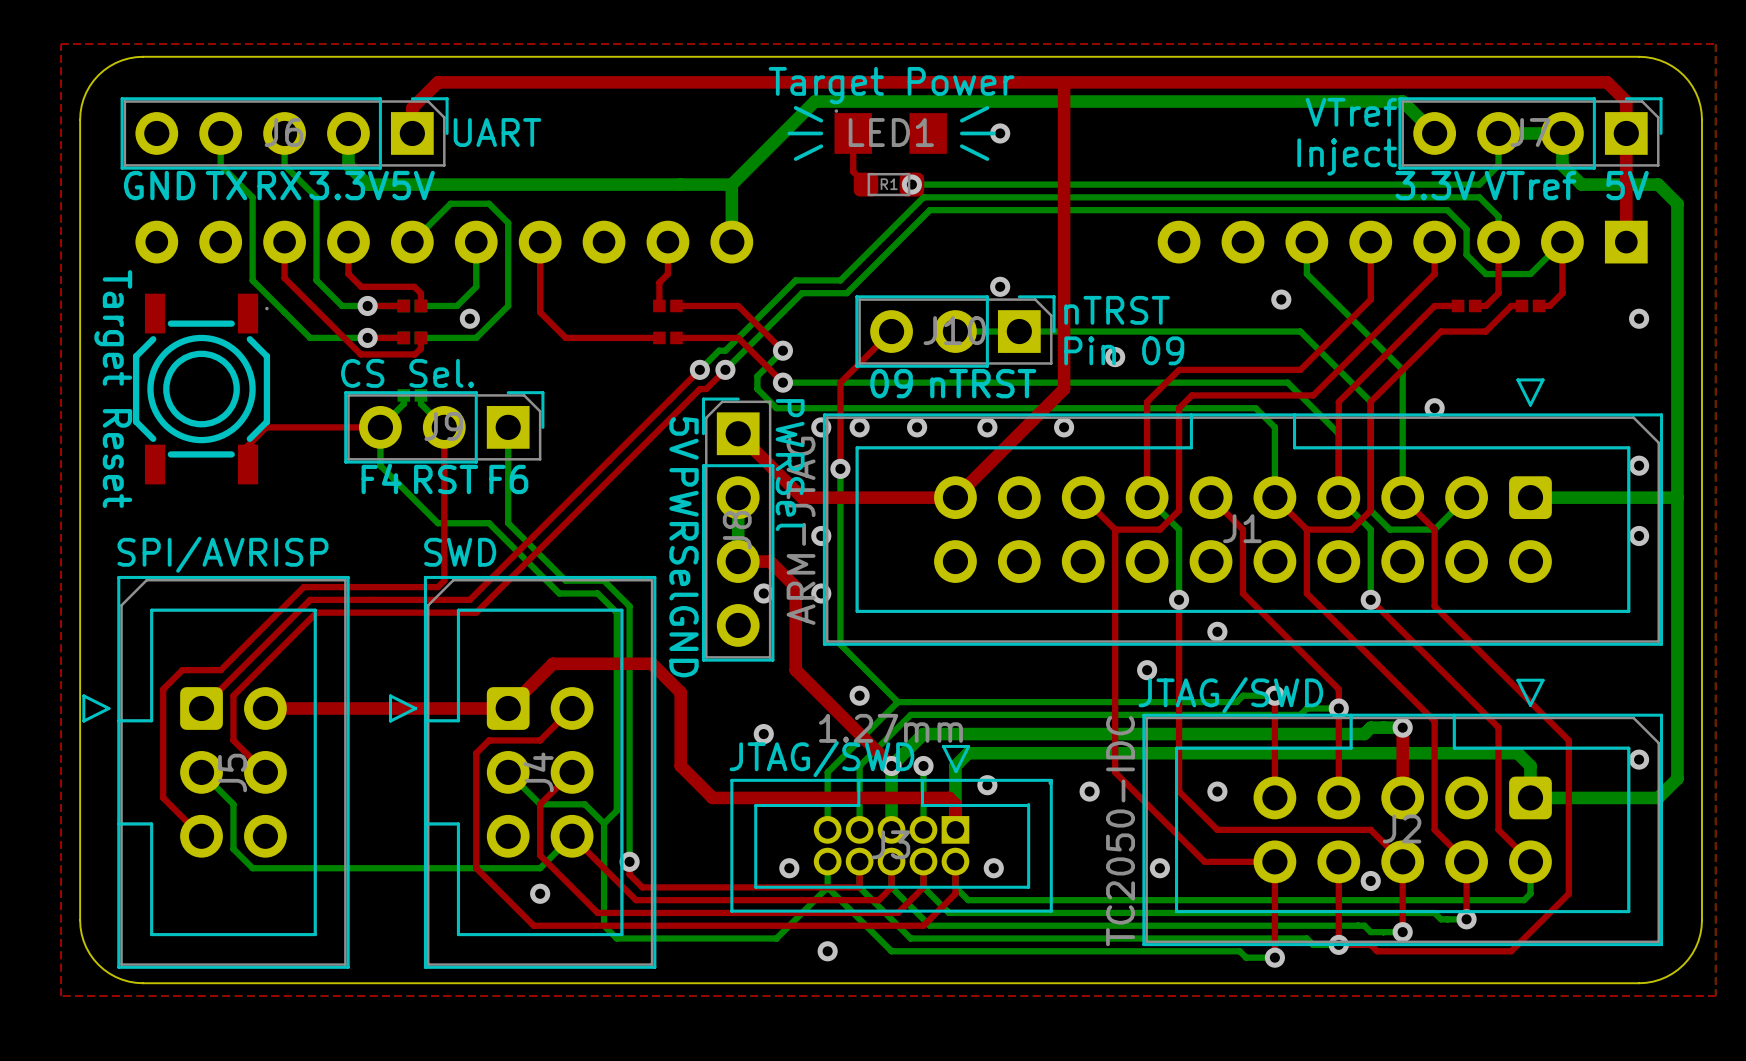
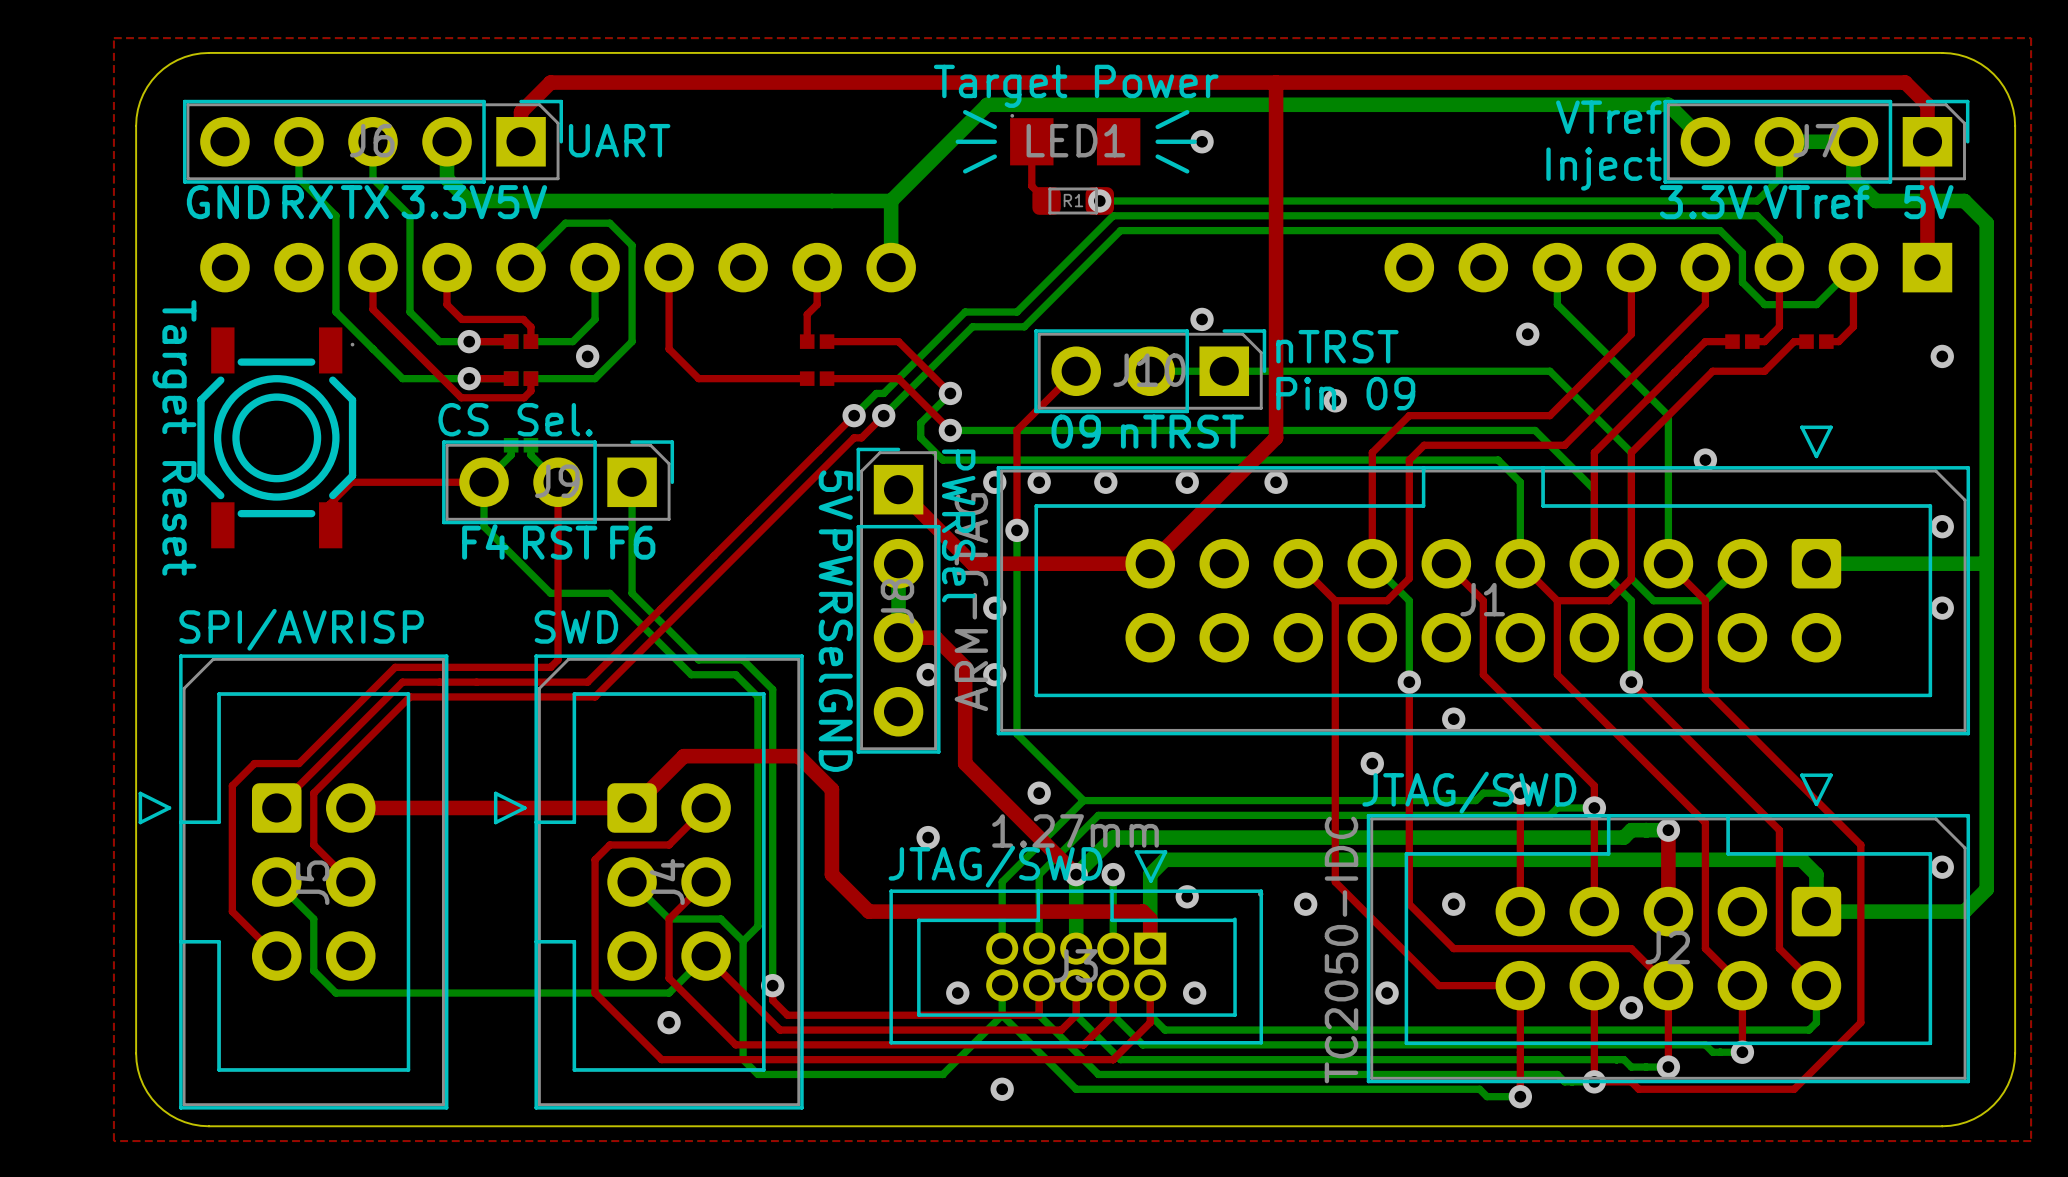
text: TX (226, 185) -> RX (307, 202)
text: RX (279, 185) -> TX (364, 202)

